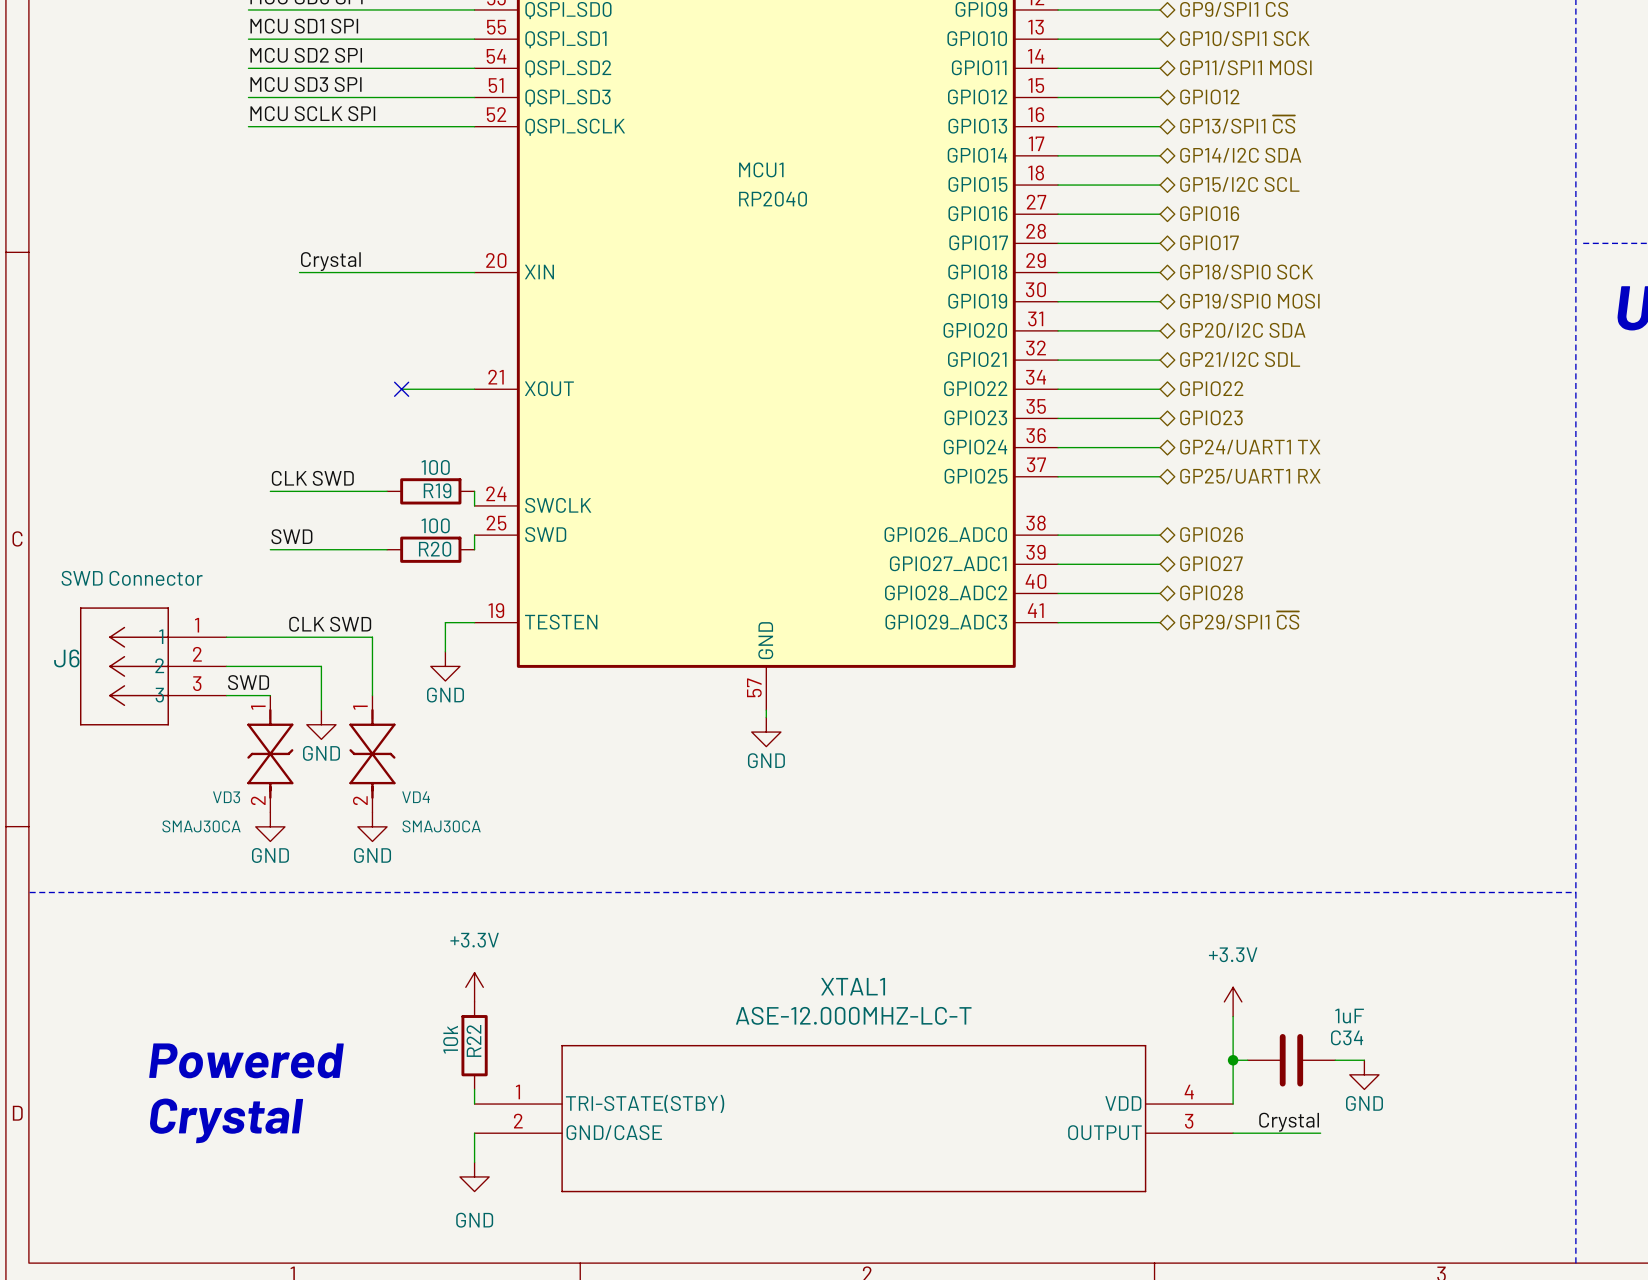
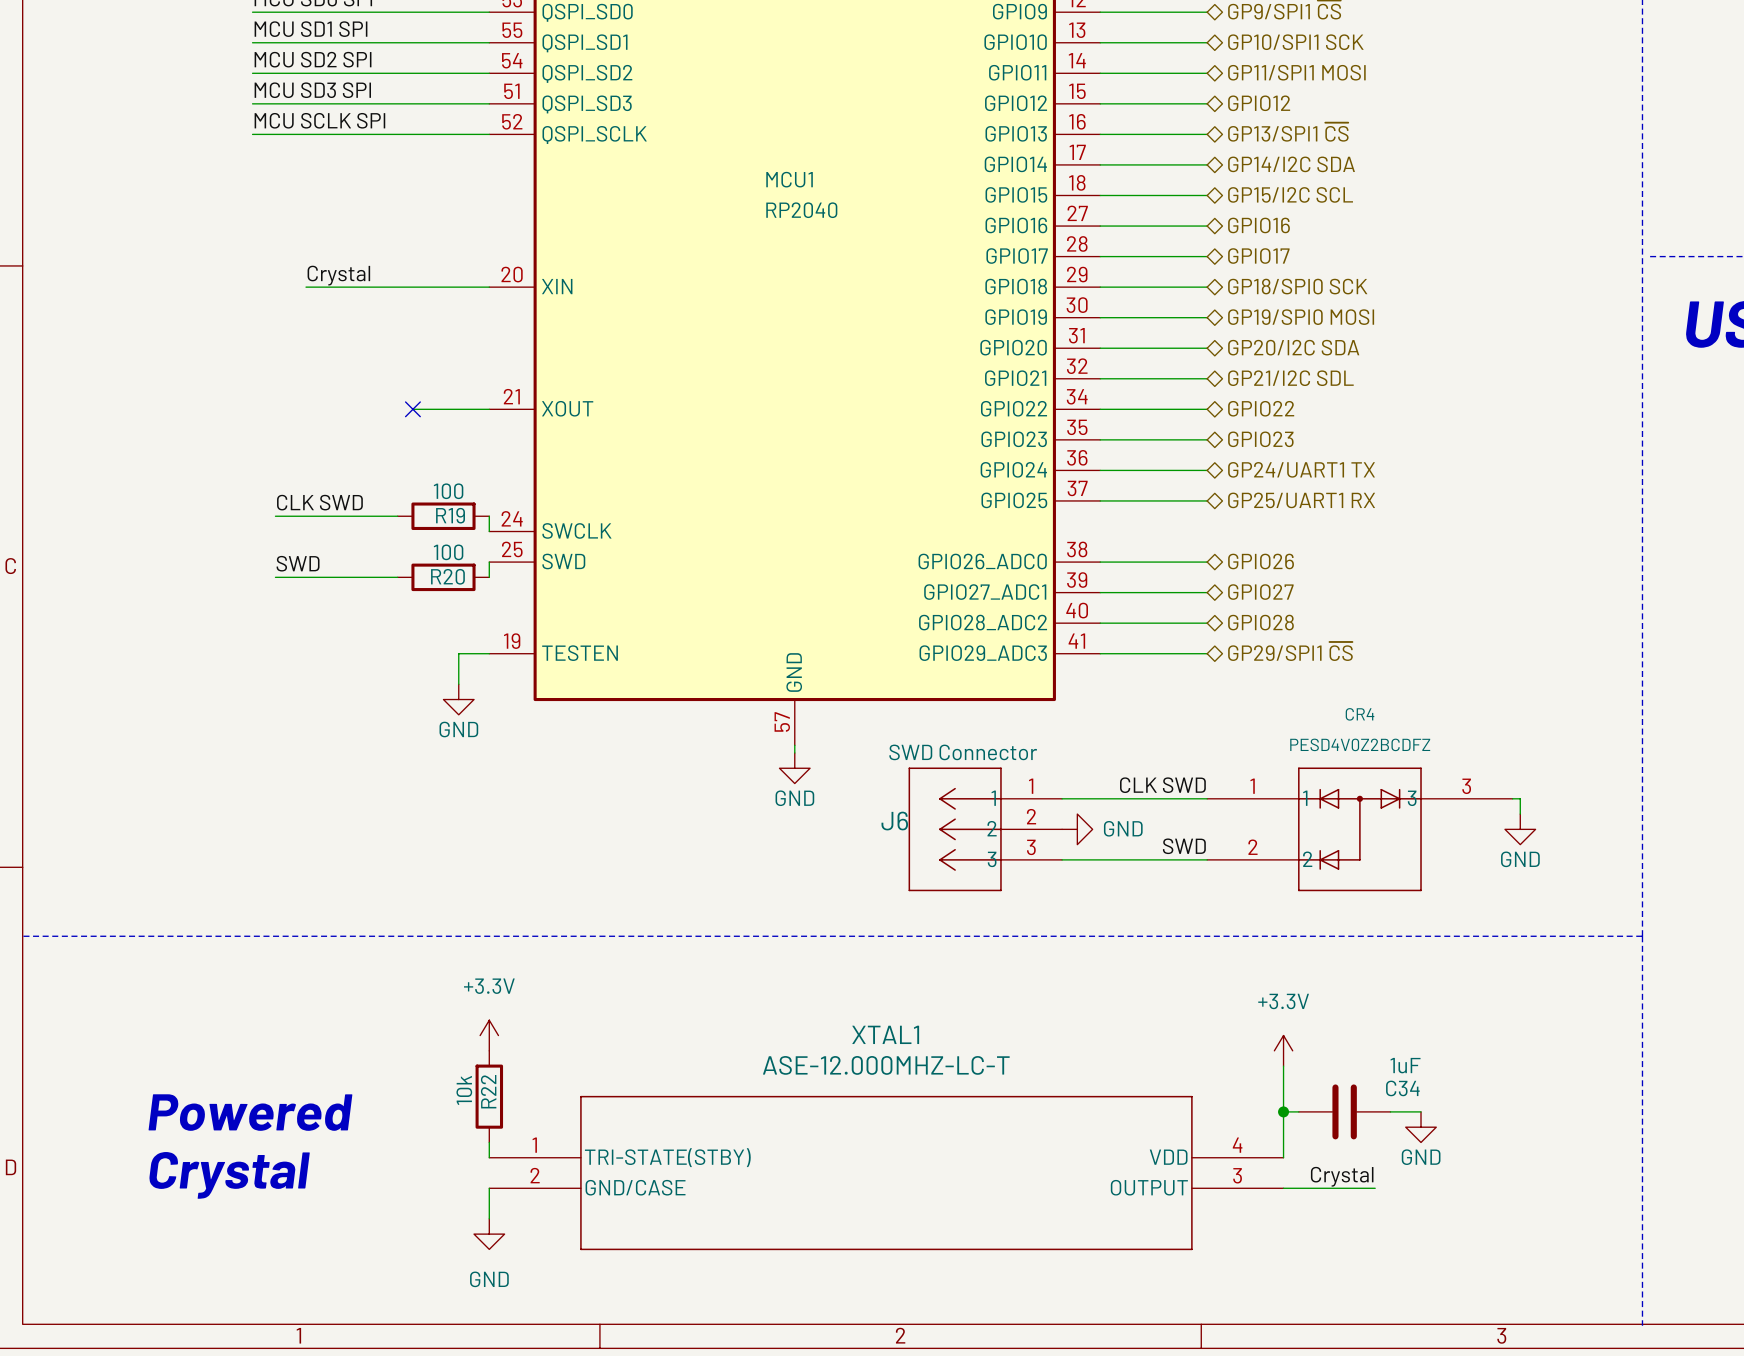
J6 text position: SWD Connector (132, 578) -> SWD Connector (963, 752)
label: CLK SWD (330, 624) -> none
wire: (226, 637) (372, 637) (372, 695) -> none
J6 position: (153, 666) -> (985, 829)
wire: (226, 666) (321, 666) (321, 710) -> none
label: SWD (248, 682) -> none
wire: (226, 695) (270, 695) -> none
power symbol: GND (321, 724) -> none
label: none -> CLK SWD (1162, 785)
VD3: SMAJ30CA (270, 753) -> none
VD4: SMAJ30CA (372, 753) -> none
wire: none -> (1062, 798) (1207, 798)
wire: none -> (1512, 798) (1520, 798) (1520, 814)
power symbol: none -> GND (1077, 829)
CR4: none -> PESD4V0Z2BCDFZ (1359, 829)
power symbol: none -> GND (1520, 829)
label: none -> SWD (1184, 846)
wire: none -> (1062, 859) (1207, 859)
power symbol: GND (270, 826) -> none
power symbol: GND (372, 826) -> none

